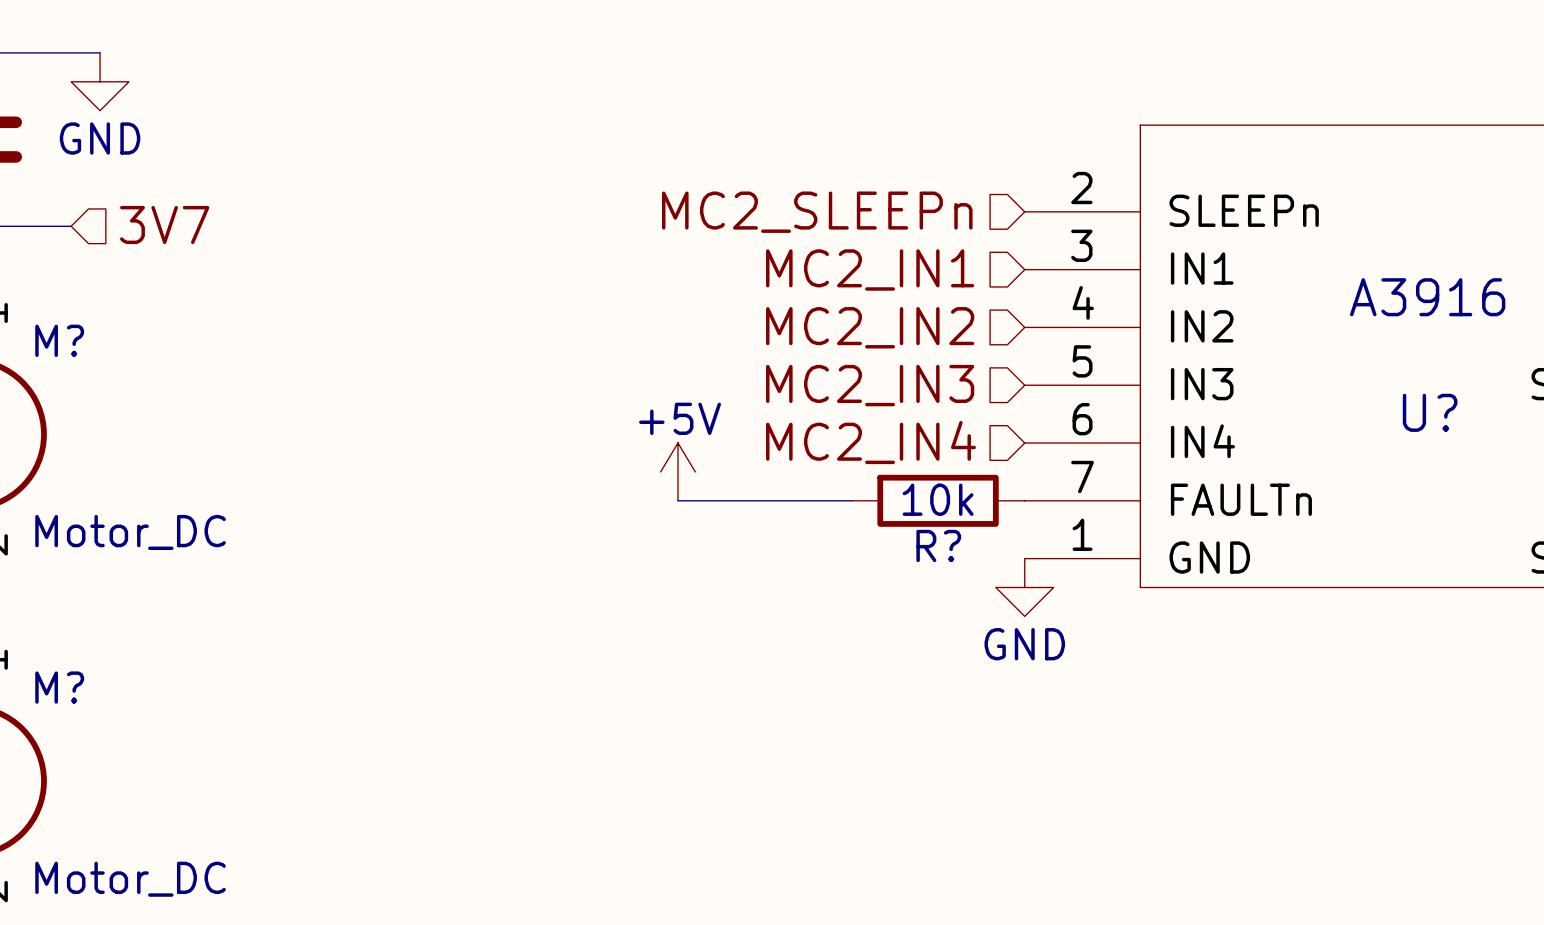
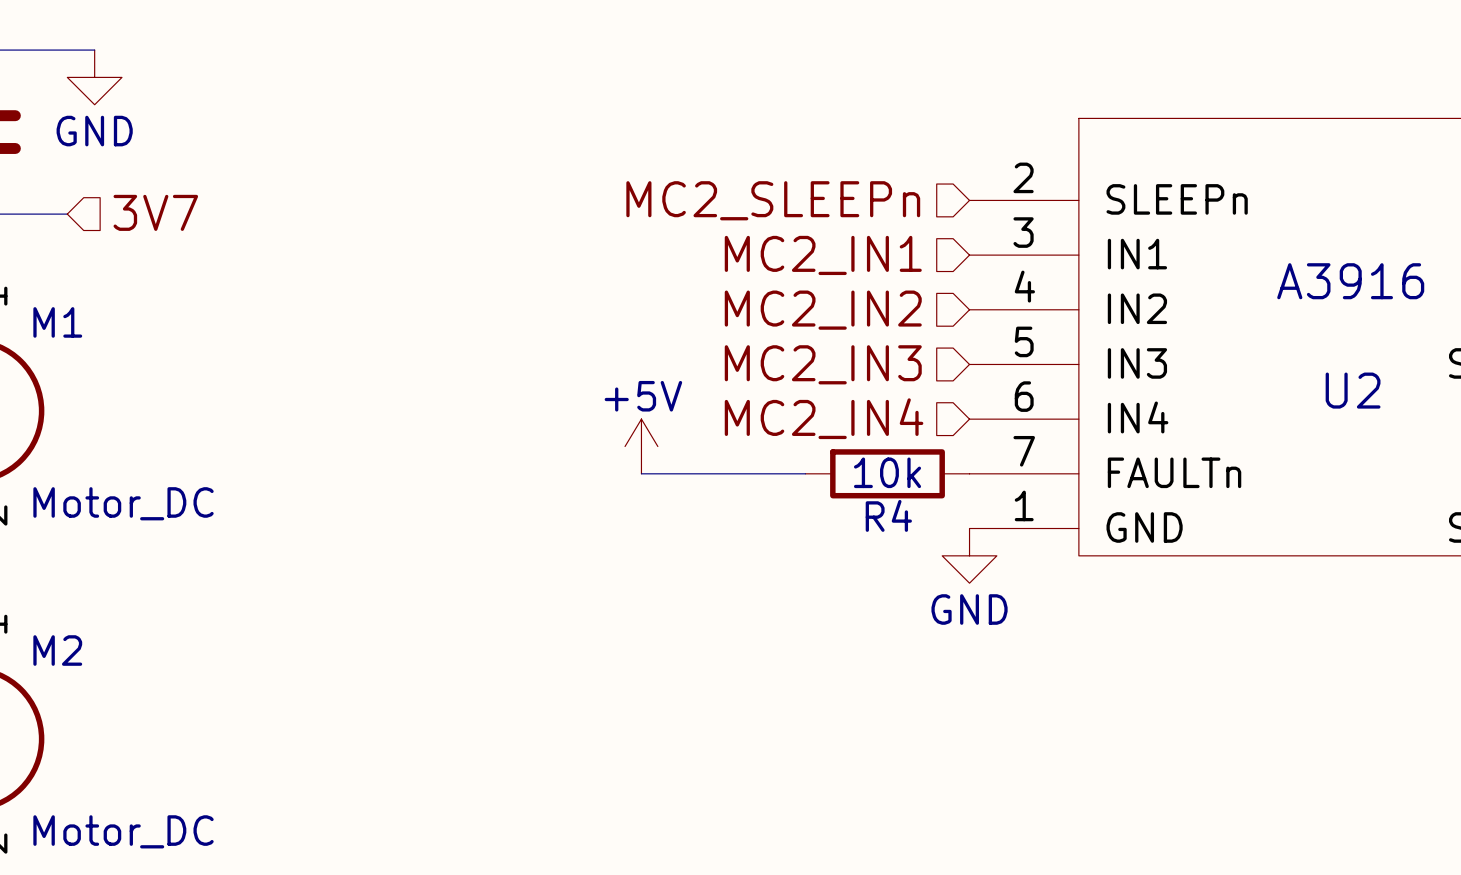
M? name: M? (59, 340) -> M1 (57, 322)
U? name: U? (1430, 412) -> U2 (1353, 390)
R? name: R? (938, 545) -> R4 (888, 515)
M? name: M? (59, 687) -> M2 (57, 650)

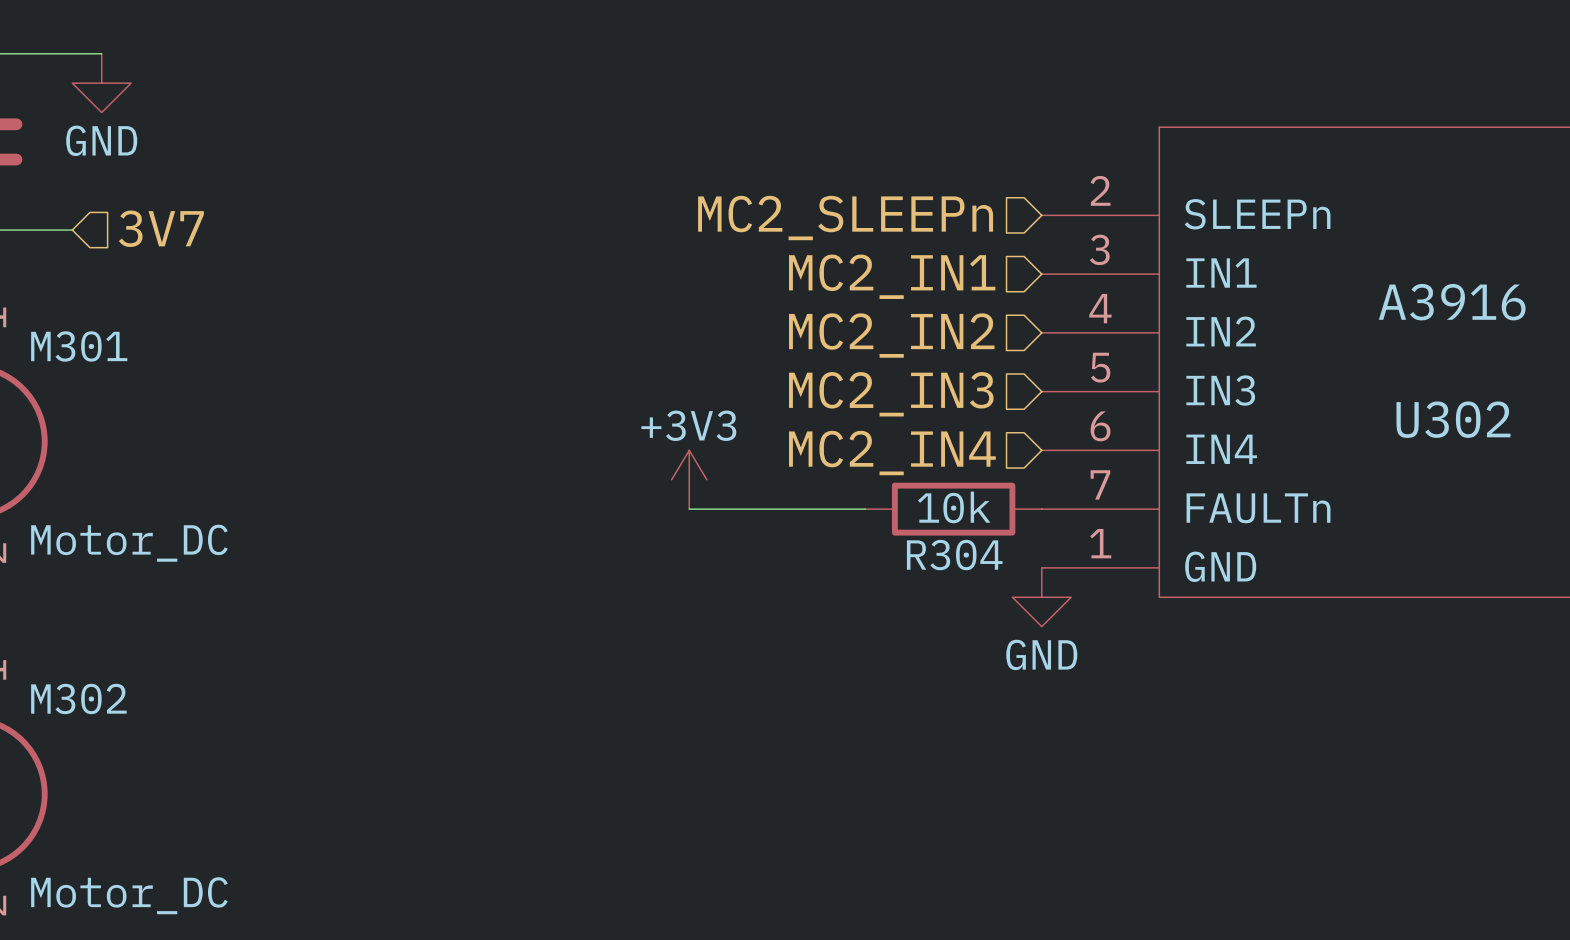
M1 name: M1 (57, 322) -> M301 (79, 346)
U2 name: U2 (1353, 390) -> U302 (1453, 419)
power symbol: +5V (641, 446) -> +3V3 (689, 479)
R4 name: R4 (888, 515) -> R304 (954, 555)
M2 name: M2 (57, 650) -> M302 (78, 698)

